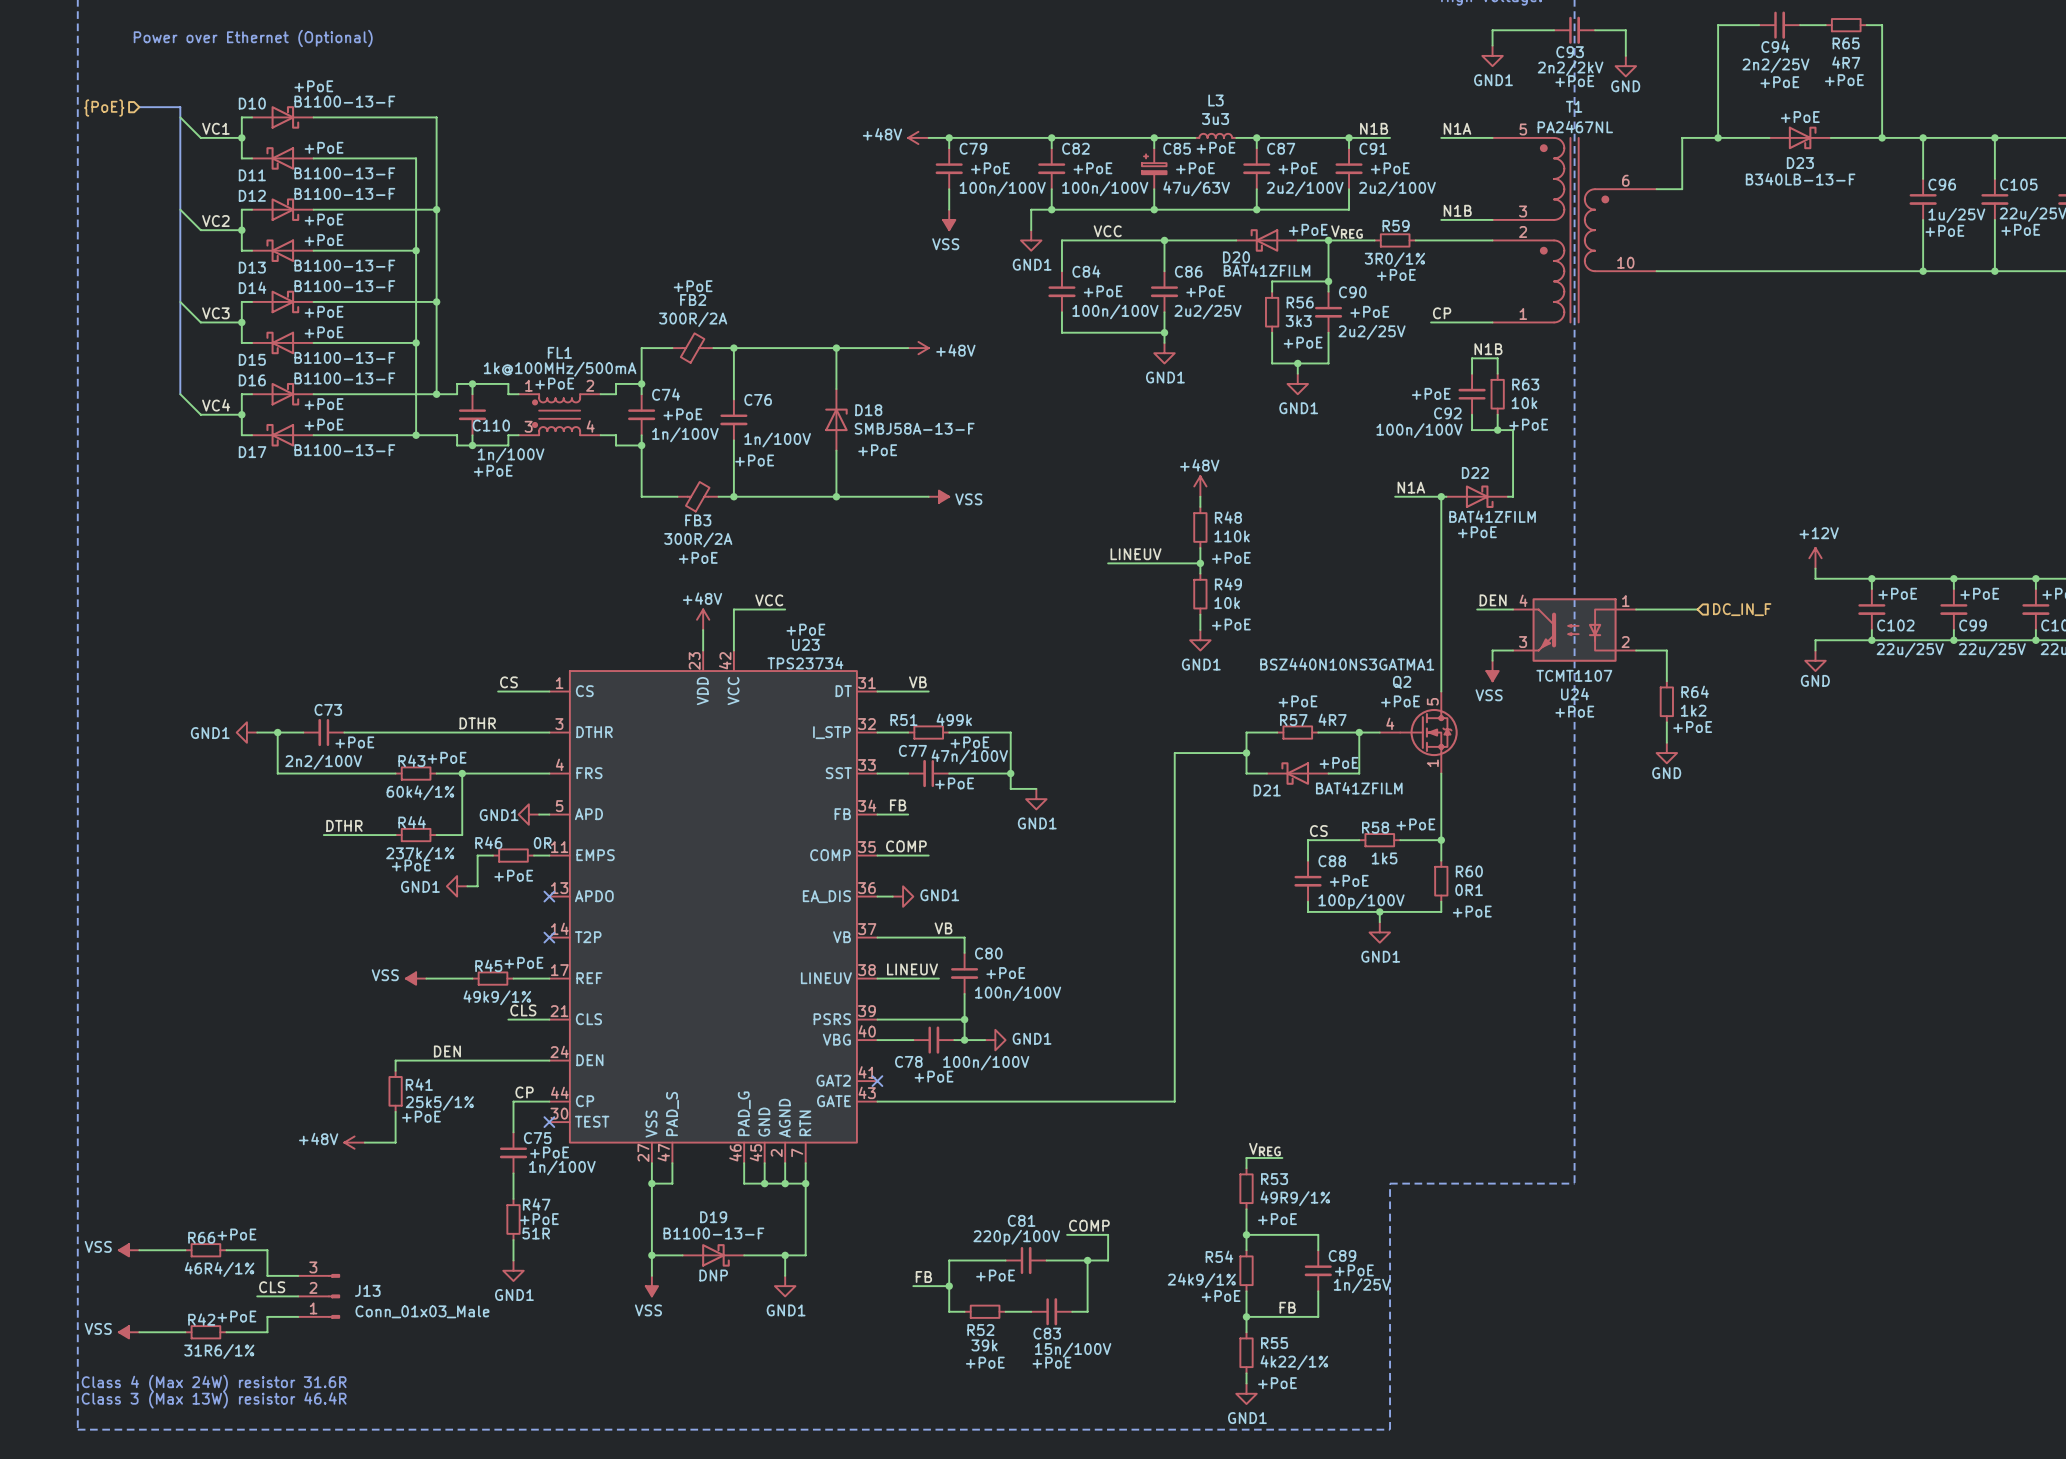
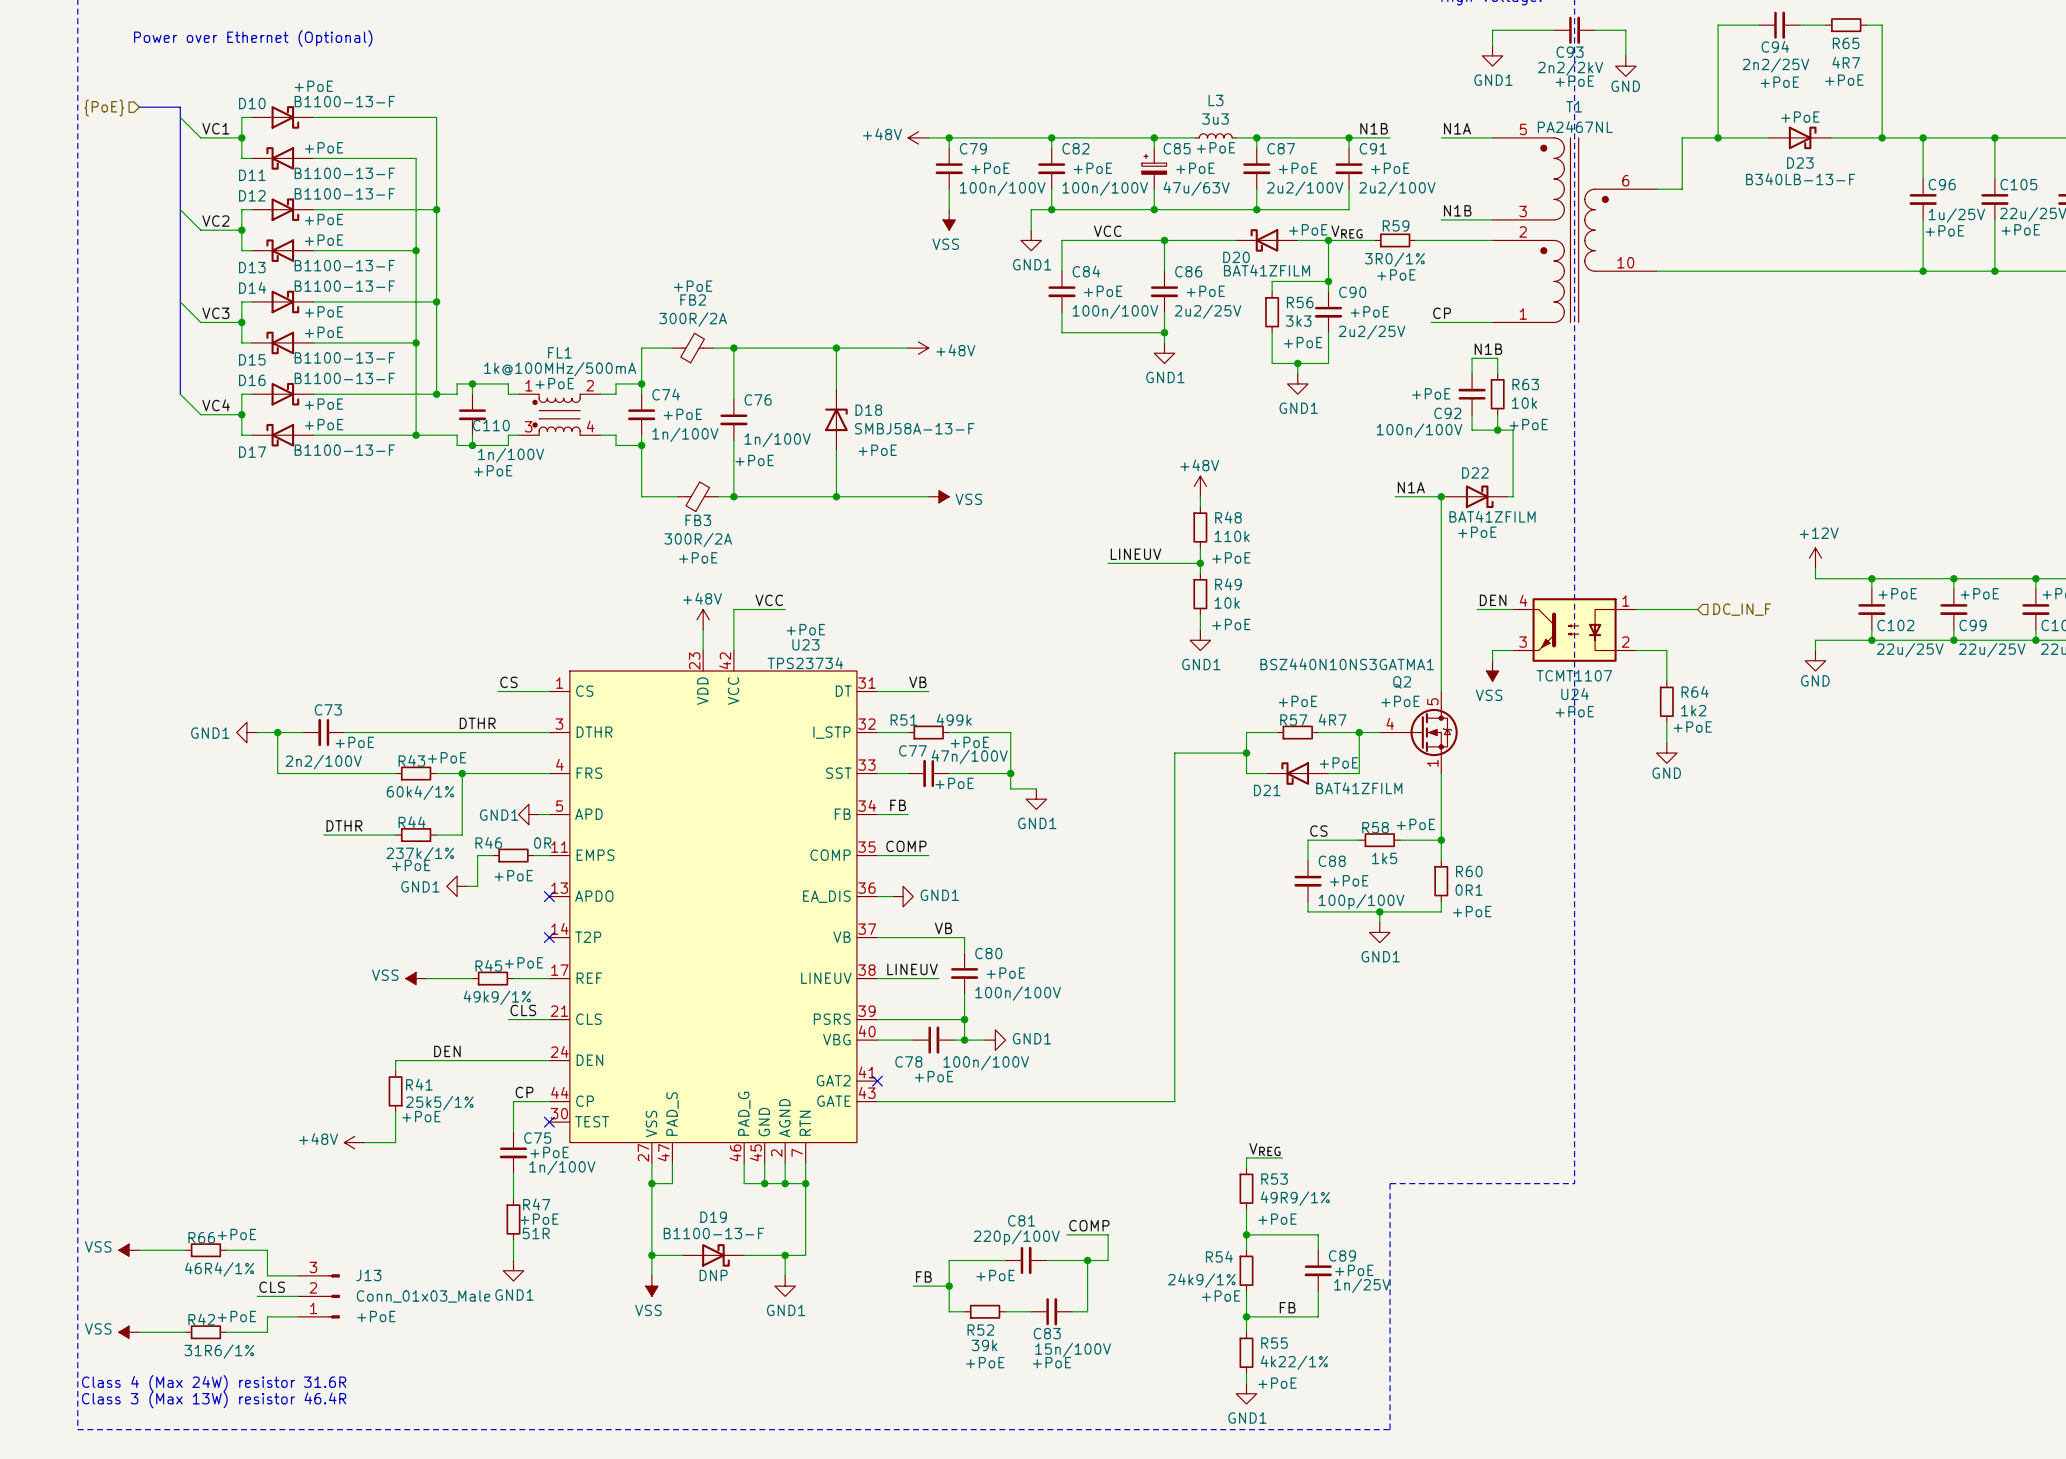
J13 name position: J13 (367, 1290) -> J13 (368, 1275)
J13 value position: Conn_01x03_Male (422, 1311) -> Conn_01x03_Male (423, 1296)
J13 text: none -> +PoE (376, 1316)

